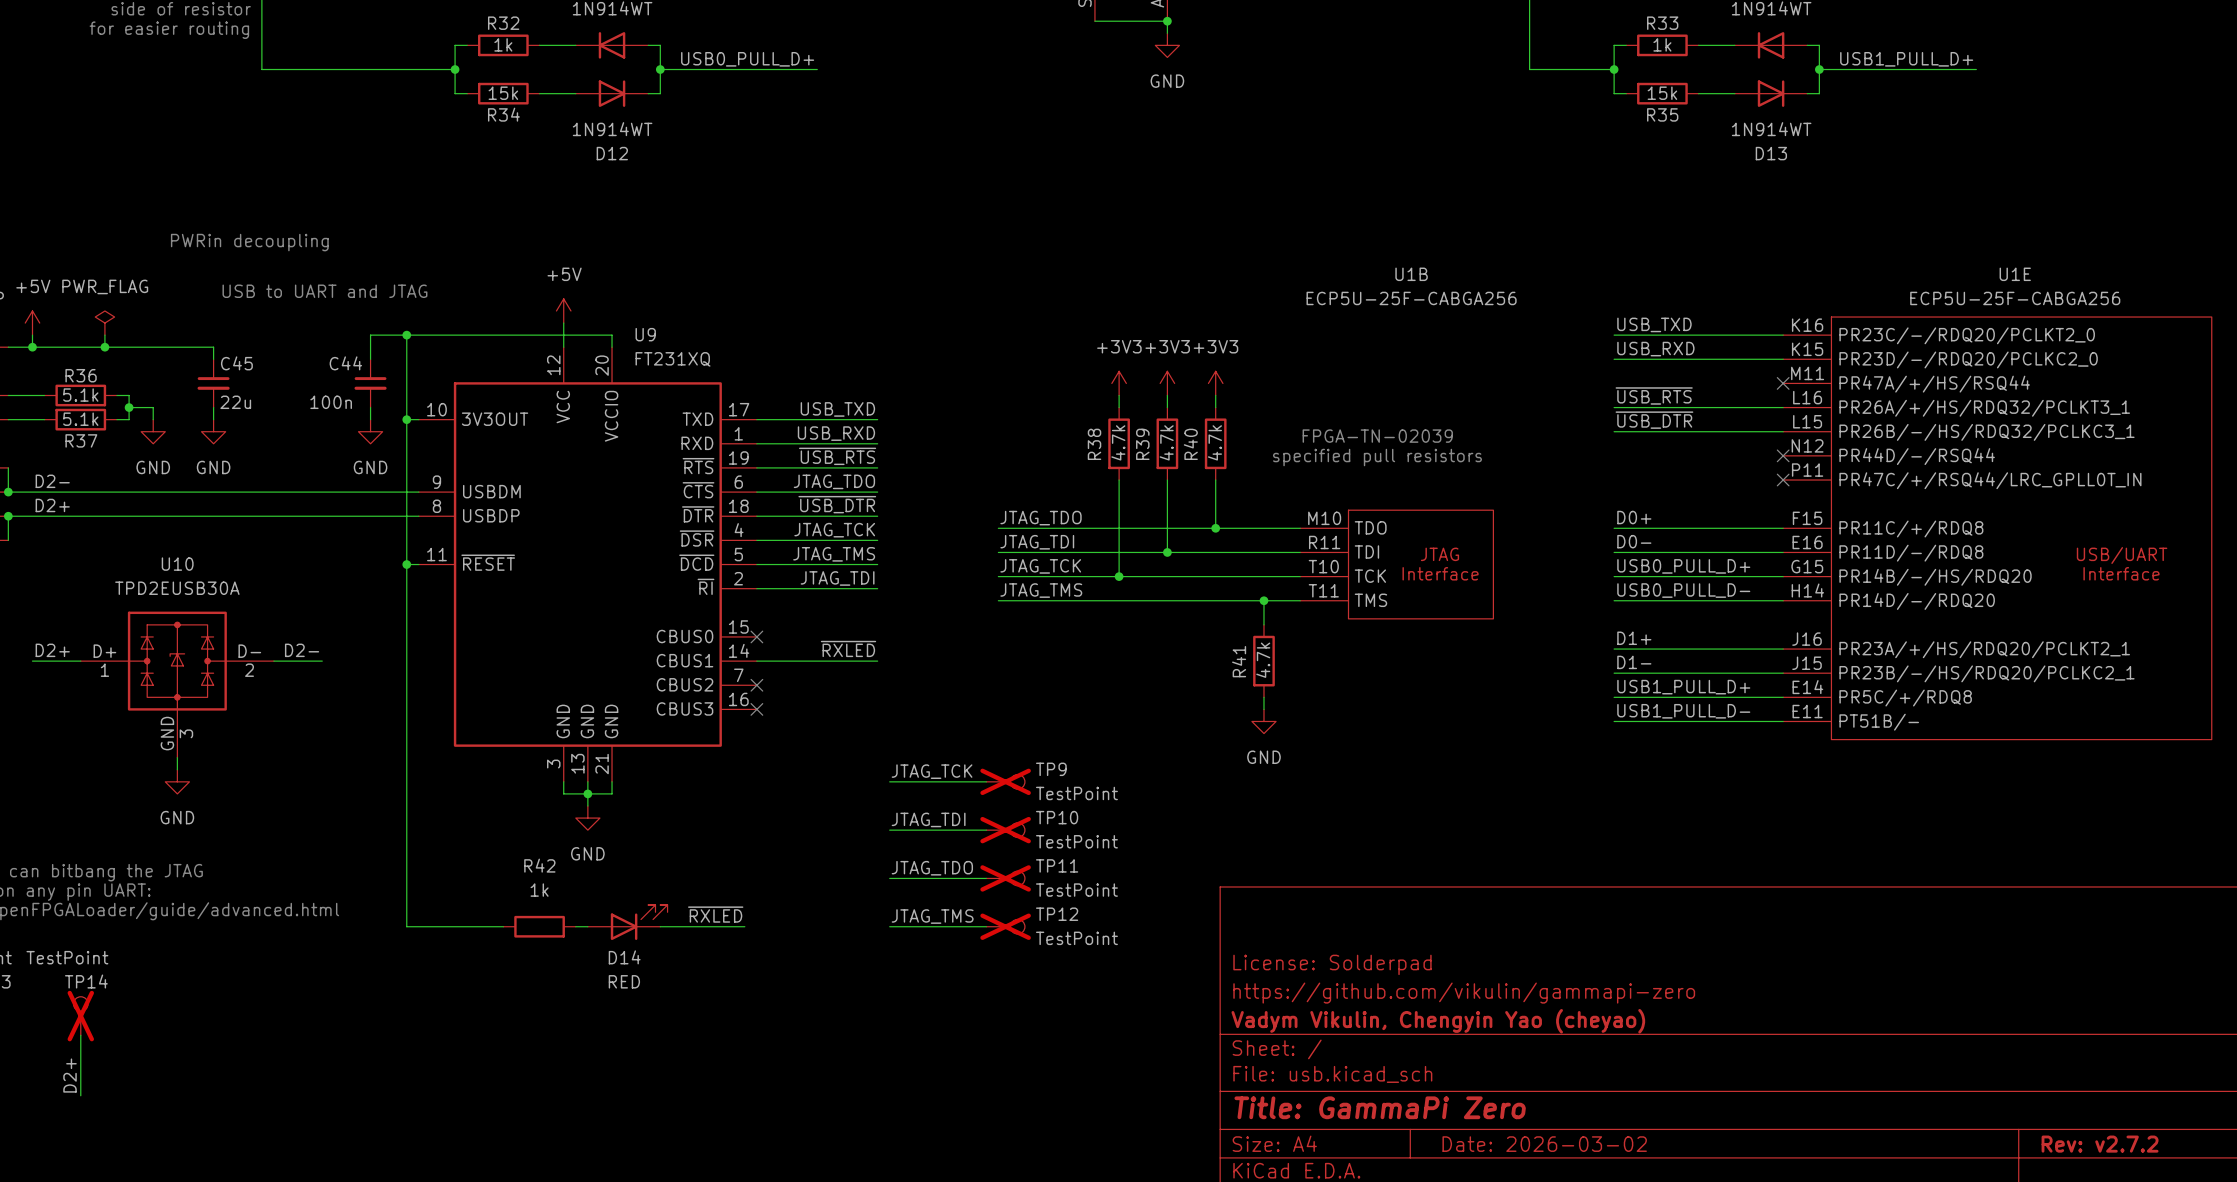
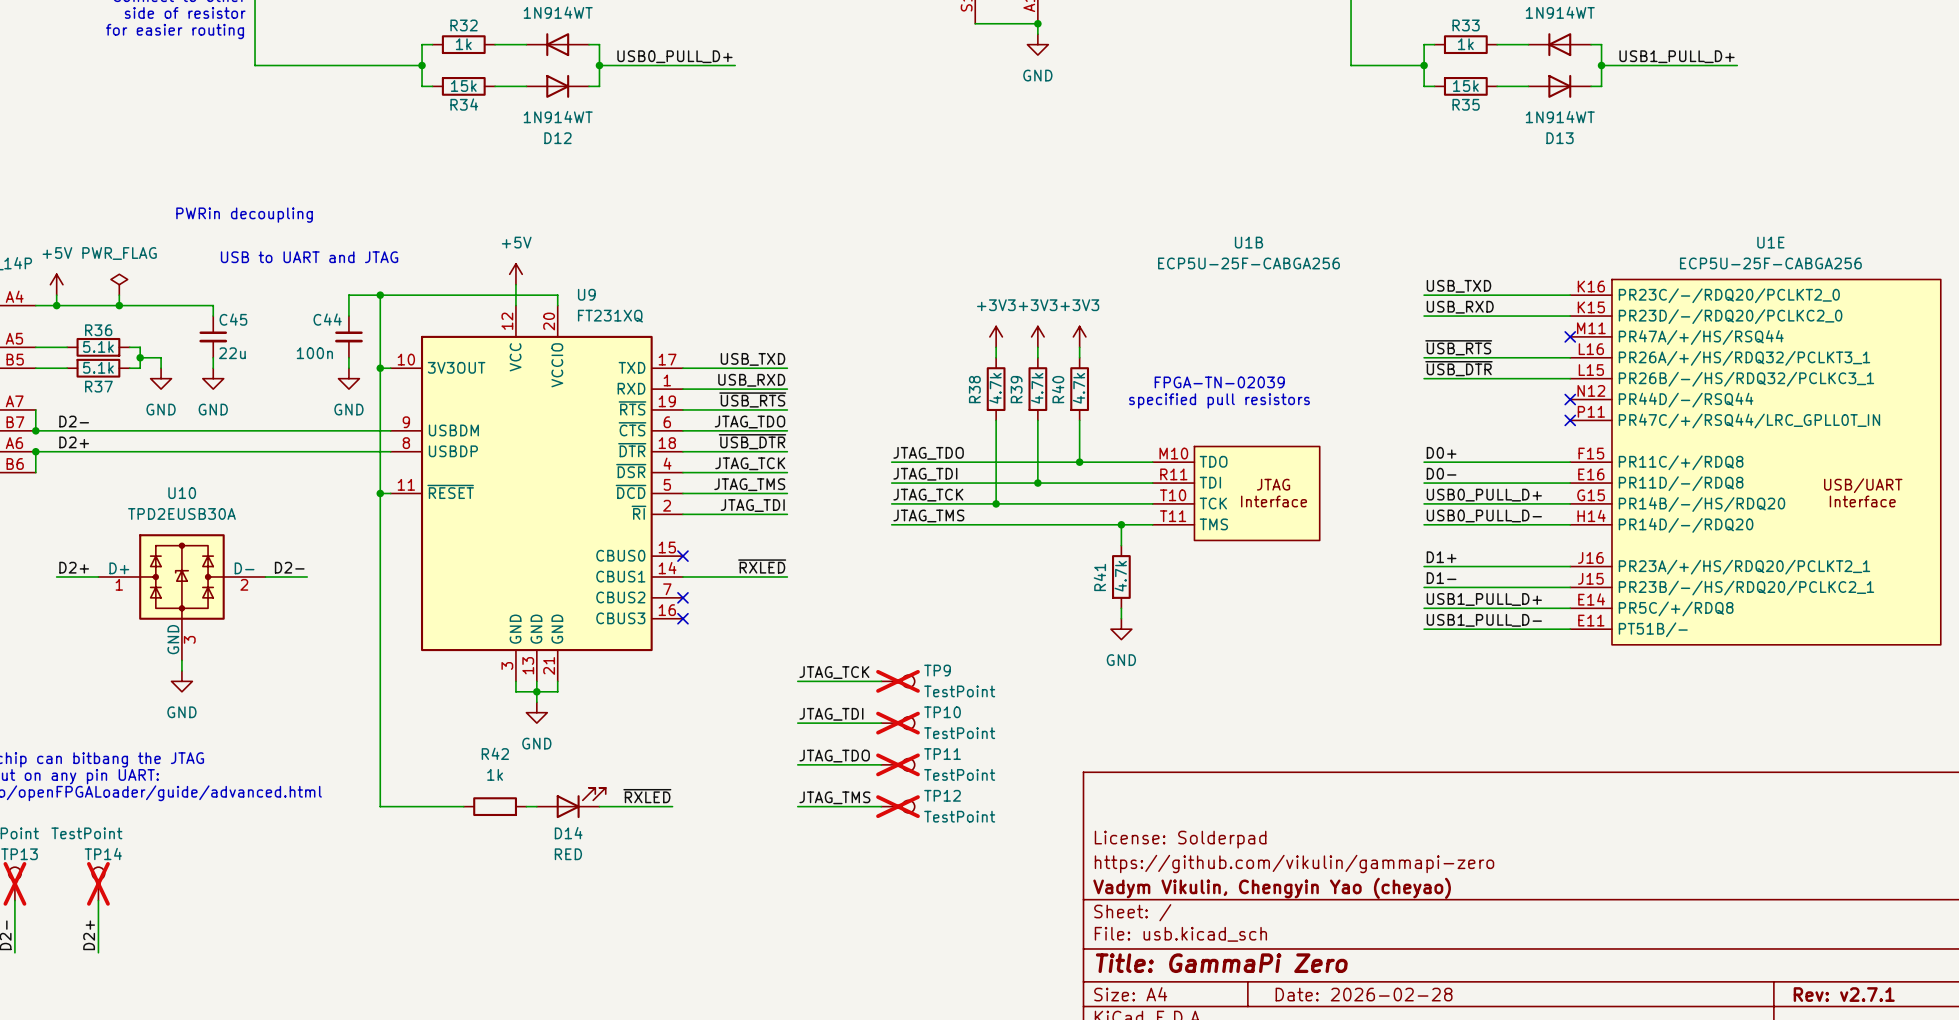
title block: Date: 2026-03-02 (1544, 1144) -> Date: 2026-02-28 (1364, 994)
title block: Rev: v2.7.2 (2100, 1144) -> Rev: v2.7.1 (1844, 994)

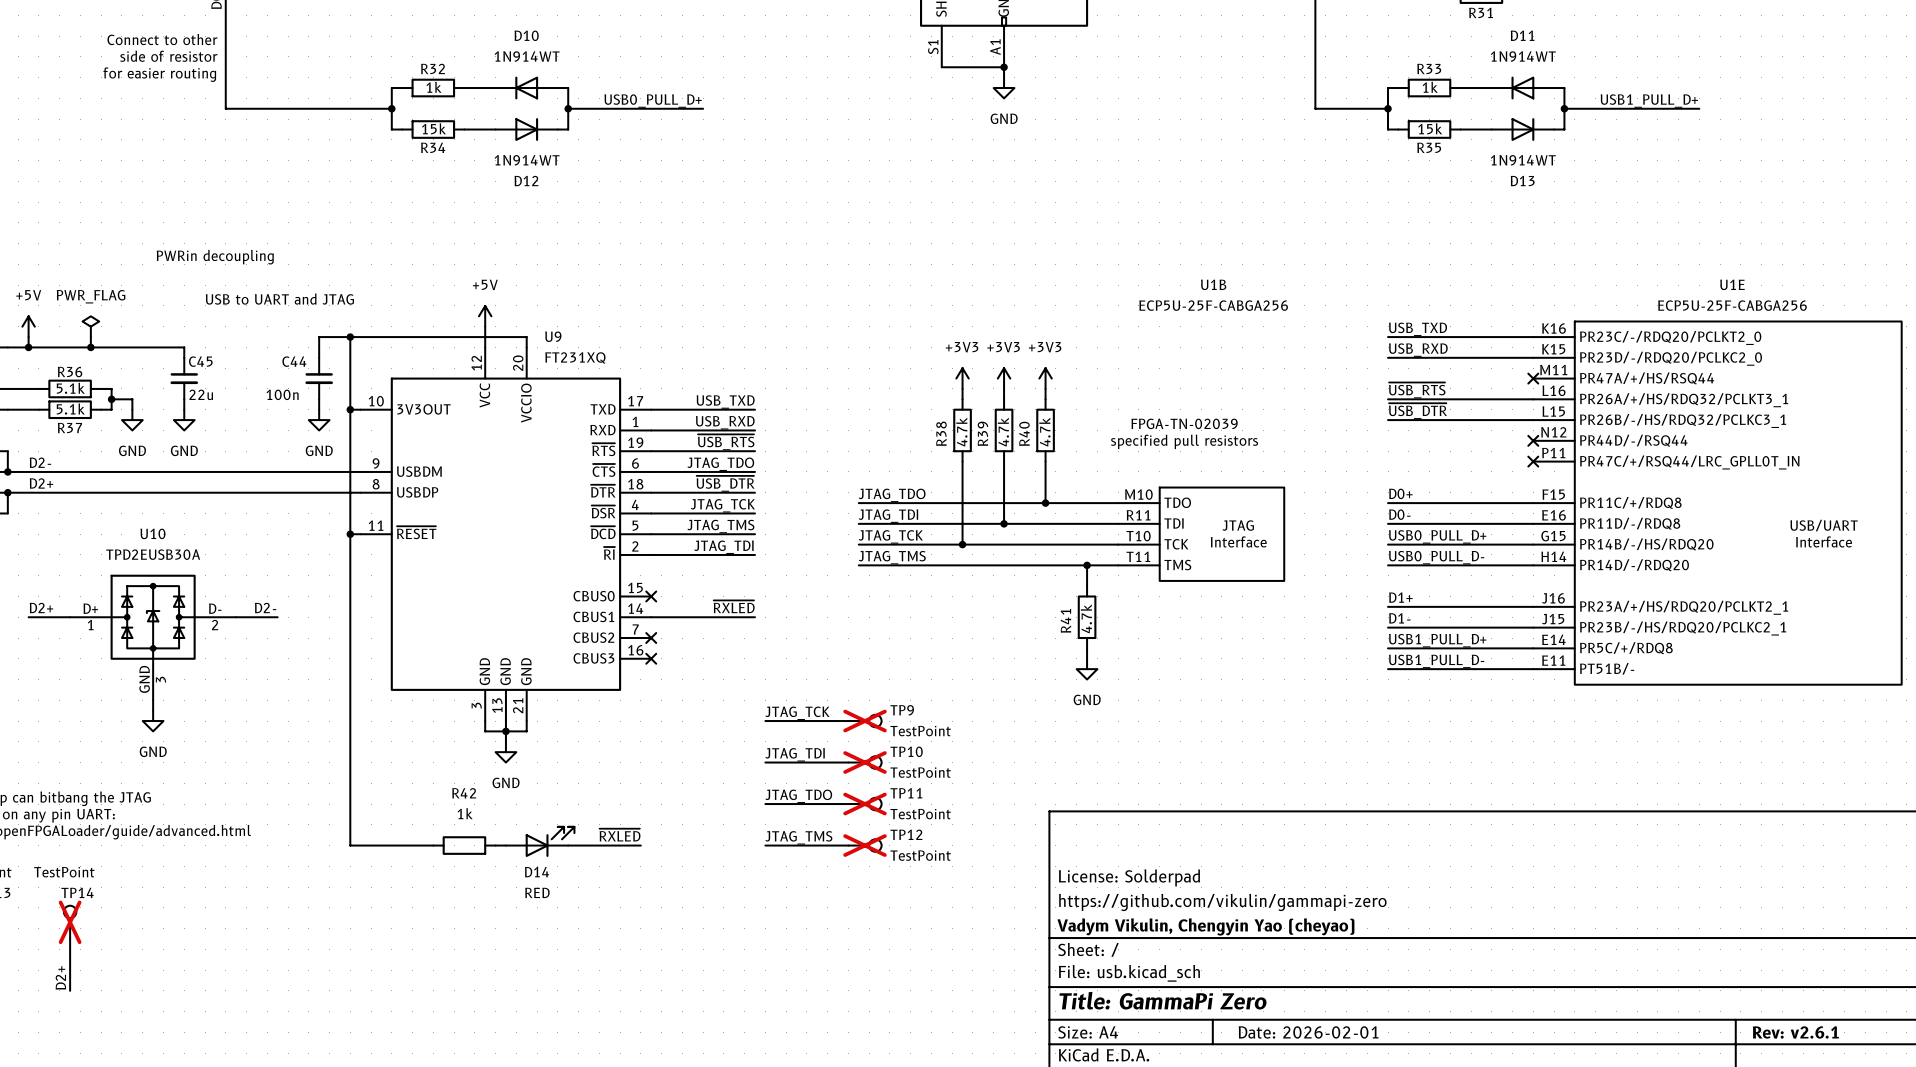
title block: Date: 2026-02-28 (1364, 994) -> Date: 2026-02-01 (1308, 1032)
title block: Rev: v2.7.1 (1844, 994) -> Rev: v2.6.1 (1795, 1032)

